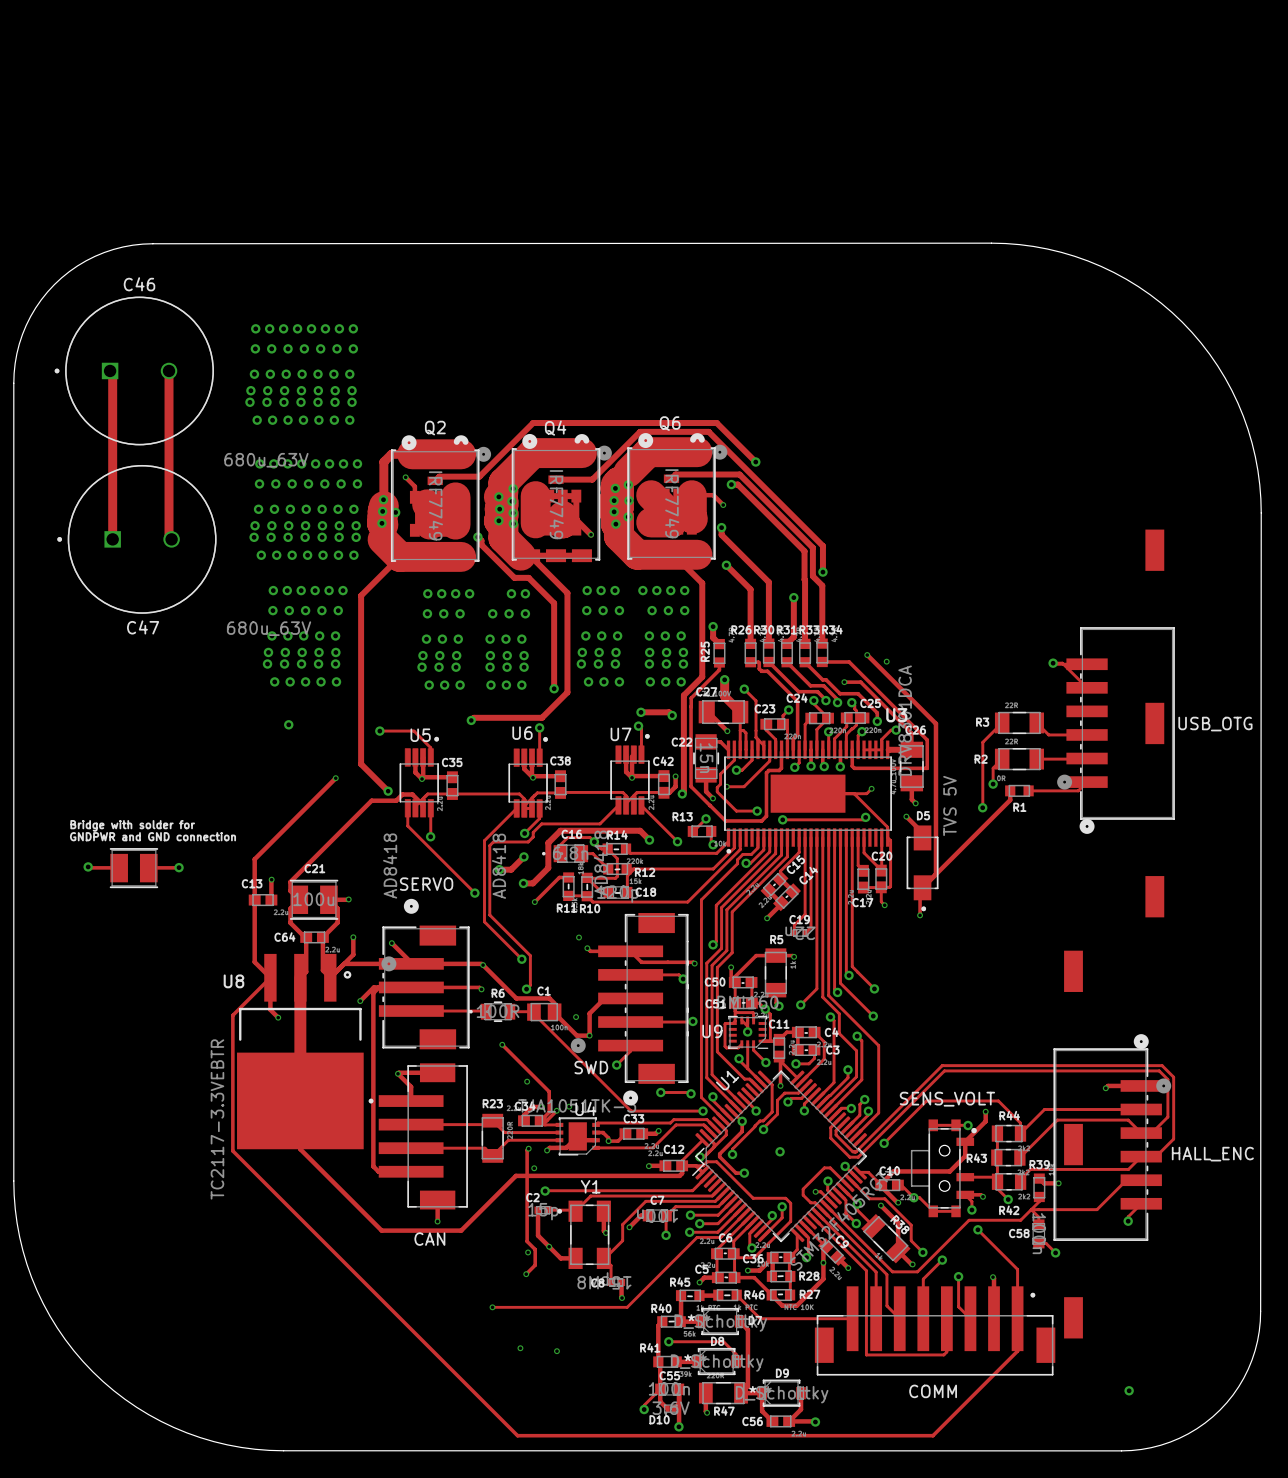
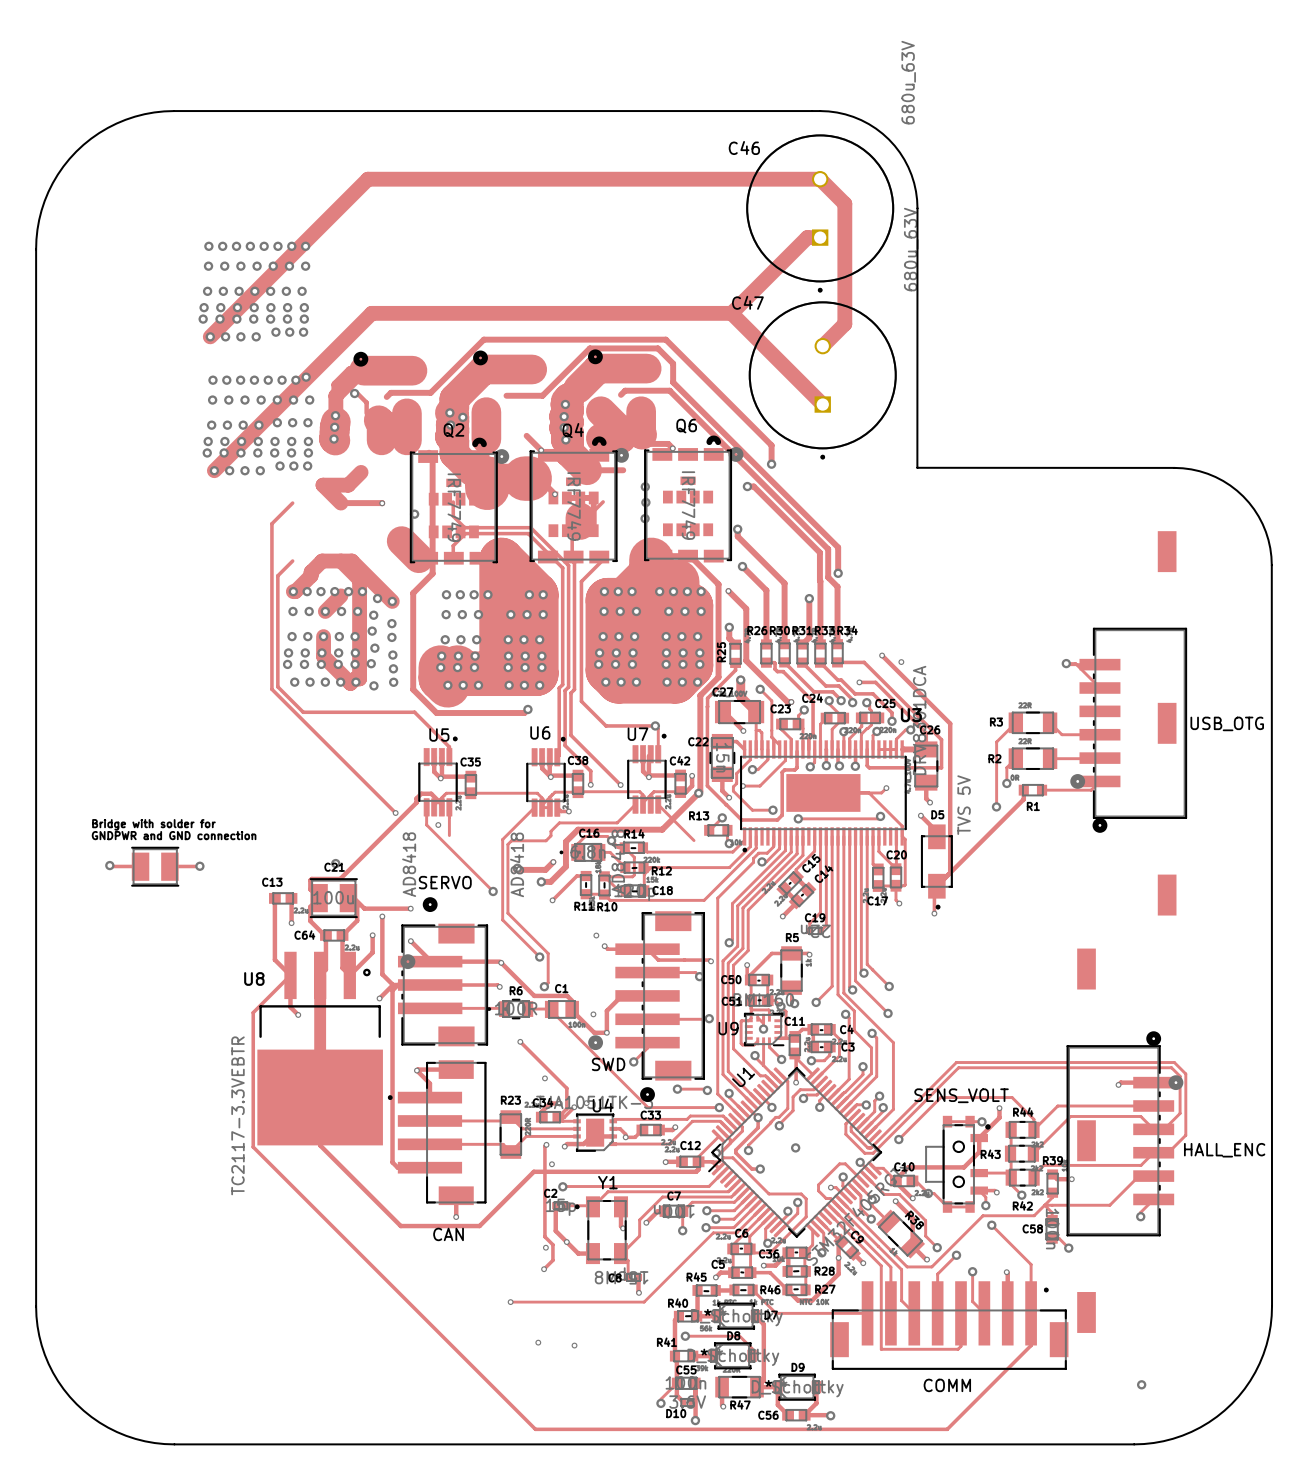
track: none -> (820, 237) (807, 237) (731, 313)
via: none -> (208, 246)
via: none -> (222, 246)
via: none -> (236, 246)
via: none -> (250, 246)
via: none -> (264, 246)
via: none -> (277, 246)
via: none -> (291, 246)
via: none -> (305, 246)
via: none -> (208, 266)
via: none -> (224, 266)
via: none -> (240, 266)
via: none -> (257, 266)
via: none -> (273, 266)
via: none -> (289, 266)
via: none -> (305, 266)
C46 name position: C46 (139, 284) -> C46 (744, 148)
via: none -> (207, 291)
via: none -> (223, 291)
via: none -> (239, 291)
via: none -> (254, 291)
via: none -> (270, 291)
via: none -> (286, 291)
via: none -> (302, 291)
via: none -> (204, 307)
via: none -> (220, 307)
via: none -> (237, 307)
via: none -> (254, 307)
via: none -> (270, 307)
via: none -> (287, 307)
via: none -> (304, 307)
track: none -> (731, 313) (822, 404)
track: none -> (731, 313) (371, 313) (214, 470)
via: none -> (203, 319)
via: none -> (220, 319)
via: none -> (236, 319)
via: none -> (253, 319)
via: none -> (270, 319)
via: none -> (287, 319)
via: none -> (304, 319)
via: (297, 328) -> none
via: (311, 328) -> none
via: (325, 328) -> none
via: (339, 328) -> none
via: (353, 328) -> none
track: none -> (210, 336) (367, 179) (820, 179) (844, 203) (844, 324) (822, 346)
via: none -> (210, 336)
via: none -> (225, 336)
via: none -> (240, 336)
via: none -> (256, 336)
via: (255, 348) -> none
via: (271, 348) -> none
via: (288, 348) -> none
via: (304, 348) -> none
via: (320, 348) -> none
via: (337, 348) -> none
via: (353, 348) -> none
part: none -> (595, 356)
part: none -> (480, 357)
part: none -> (360, 359)
track: (110, 370) (112, 373) (112, 539) -> none
C46 rotation: 0° (134, 370) -> 90° counterclockwise (820, 213)
C46 position: (134, 370) -> (820, 213)
track: (169, 370) (169, 536) (171, 539) -> none
via: (254, 374) -> none
via: (270, 374) -> none
via: (302, 374) -> none
via: (318, 374) -> none
via: (333, 374) -> none
via: (349, 374) -> none
via: none -> (212, 380)
via: none -> (226, 380)
via: none -> (240, 380)
via: none -> (254, 380)
via: none -> (268, 380)
via: none -> (282, 380)
via: none -> (295, 380)
board edge: (13, 383) (16, 353) (22, 334) (35, 307) (54, 284) (69, 271) (94, 256) (123, 246) (142, 244) (1005, 243) (1047, 249) (1074, 256) (1113, 272) (1150, 294) (1191, 332) (1225, 378) (1248, 429) (1259, 484) (1260, 1311) -> (36, 386) (36, 239) (44, 201) (63, 166) (83, 144) (107, 127) (135, 116) (173, 111) (820, 111) (845, 114) (875, 128) (888, 139) (904, 159) (911, 175) (917, 199) (917, 467) (1191, 469) (1215, 477) (1237, 490) (1254, 509) (1265, 531) (1271, 565) (1272, 1306)
via: (250, 390) -> none
via: (267, 390) -> none
via: (284, 390) -> none
via: (301, 390) -> none
via: (318, 390) -> none
via: (352, 390) -> none
via: none -> (212, 400)
via: none -> (228, 400)
via: none -> (244, 400)
via: none -> (261, 400)
via: none -> (277, 400)
via: none -> (293, 400)
via: none -> (309, 400)
track: none -> (565, 400) (568, 397) (565, 404) (568, 407) (568, 411) (564, 416) (568, 421) (564, 427) (568, 432) (568, 436) (565, 439) (568, 442) (568, 451) (587, 470) (623, 470)
via: none -> (565, 404)
via: (249, 402) -> none
via: (266, 402) -> none
via: (283, 402) -> none
via: (301, 402) -> none
via: (318, 402) -> none
via: (335, 402) -> none
via: (352, 402) -> none
track: none -> (641, 411) (642, 434)
via: none -> (449, 412)
via: none -> (335, 415)
via: none -> (462, 417)
via: none -> (564, 416)
track: none -> (335, 422) (335, 395) (361, 370) (349, 370) (335, 384) (335, 415) (335, 422)
track: none -> (335, 422) (335, 440)
via: (303, 420) -> none
via: (318, 420) -> none
via: (334, 420) -> none
via: (349, 420) -> none
via: none -> (211, 425)
via: none -> (227, 425)
via: none -> (243, 425)
via: none -> (258, 425)
via: none -> (450, 425)
via: none -> (334, 427)
via: none -> (564, 427)
track: (708, 431) (640, 431) (592, 479) (556, 479) -> (725, 434) (673, 382) (673, 363) (657, 348) (589, 348) (542, 395) (506, 395)
via: none -> (333, 439)
via: none -> (565, 439)
via: none -> (208, 441)
via: none -> (224, 441)
via: none -> (241, 441)
via: none -> (258, 441)
via: none -> (275, 441)
via: none -> (291, 441)
via: none -> (308, 441)
part: (645, 440) -> none
part: (529, 441) -> none
track: none -> (641, 443) (668, 443) (672, 448)
part: (409, 442) -> none
via: none -> (672, 448)
via: none -> (541, 450)
via: none -> (207, 452)
via: none -> (224, 452)
via: none -> (240, 452)
via: none -> (257, 452)
via: none -> (274, 452)
via: none -> (291, 452)
via: none -> (308, 452)
track: none -> (429, 452) (432, 456) (432, 573) (413, 593) (413, 689) (436, 713) (524, 713) (527, 709)
track: (697, 452) (648, 452) (628, 472) -> (646, 368) (598, 368) (578, 388)
track: (581, 453) (533, 453) (503, 482) (503, 492) -> (532, 369) (483, 369) (454, 398) (454, 408)
track: (409, 454) (391, 454) (383, 462) (383, 524) -> none
track: (412, 454) (461, 454) -> (364, 370) (412, 370)
track: (755, 462) (716, 423) (533, 423) (479, 476) (439, 476) (435, 480) -> (771, 464) (771, 445) (665, 339) (483, 339) (430, 392) (390, 392) (386, 396)
via: (301, 463) -> none
via: (315, 463) -> none
via: (329, 463) -> none
via: (343, 463) -> none
via: (357, 463) -> none
via: none -> (214, 470)
via: none -> (229, 470)
via: none -> (244, 470)
via: none -> (260, 470)
track: none -> (361, 472) (348, 485) (323, 485) (340, 503) (382, 503)
track: (739, 474) (675, 474) (671, 478) -> (755, 476) (669, 390) (625, 390) (621, 394)
track: none -> (486, 478) (487, 487)
track: none -> (525, 478) (539, 478) (555, 494)
track: (405, 477) (414, 486) (414, 497) -> (357, 393) (366, 402) (366, 413)
via position: (405, 477) -> (382, 503)
via: (259, 483) -> none
via: (275, 483) -> none
via: (292, 483) -> none
via: (308, 483) -> none
via: (324, 483) -> none
via: (341, 483) -> none
via: (357, 483) -> none
track: (615, 484) (618, 481) (615, 488) (618, 491) (618, 495) (614, 500) (618, 505) (614, 511) (618, 516) (618, 521) (615, 524) (618, 527) (618, 536) (637, 554) (697, 554) -> none
via: (513, 488) -> none
via: (615, 488) -> none
via: none -> (555, 494)
track: (651, 495) (672, 516) (672, 522) (651, 522) -> (600, 411) (621, 431) (621, 438) (600, 438)
track: (498, 496) (503, 501) (503, 505) (499, 509) (503, 512) (503, 516) (498, 520) (503, 525) (503, 538) (521, 555) -> (449, 412) (454, 417) (454, 421) (450, 425) (454, 428) (454, 432) (449, 436) (454, 441) (454, 453) (471, 471)
via: (498, 496) -> none
track: (535, 496) (535, 523) -> (486, 412) (486, 439)
track: (455, 497) (455, 524) -> (406, 413) (406, 440)
via: (383, 499) -> none
track: none -> (453, 502) (453, 516) (464, 527) (530, 527) (568, 565) (568, 687) (565, 690) (565, 745) (590, 771) (590, 784)
track: none -> (603, 501) (572, 532) (572, 560) (574, 563) (574, 689) (571, 693) (571, 735) (620, 785)
via: (614, 500) -> none
track: none -> (292, 503) (271, 523) (271, 689) (395, 813)
via: (511, 501) -> none
track: (427, 504) (430, 507) (430, 524) -> (378, 420) (381, 423) (381, 440)
track: (723, 505) (713, 495) (691, 495) (692, 518) -> none
via: (723, 505) -> none
via: (258, 509) -> none
via: (274, 509) -> none
via: (290, 509) -> none
via: (306, 509) -> none
via: (322, 509) -> none
via: (338, 509) -> none
via: (353, 509) -> none
via: (499, 509) -> none
via: (382, 511) -> none
via: (614, 511) -> none
via: (513, 513) -> none
via: (498, 520) -> none
track: (576, 520) (591, 534) -> (526, 435) (541, 450)
via: (381, 523) -> none
via: (513, 523) -> none
via: (615, 524) -> none
via: (255, 525) -> none
via: (271, 525) -> none
via: (288, 525) -> none
via: (305, 525) -> none
via: (322, 525) -> none
via: (339, 525) -> none
via: (356, 525) -> none
via: (591, 534) -> none
via: (254, 537) -> none
via: (271, 537) -> none
via: (288, 537) -> none
via: (305, 537) -> none
via: (322, 537) -> none
via: (339, 537) -> none
via: (356, 537) -> none
track: (477, 537) (481, 540) (481, 544) (514, 577) (528, 577) (554, 603) (554, 688) -> none
via: (477, 537) -> none
C47 rotation: 0° (136, 539) -> 90° counterclockwise (822, 380)
C47 position: (136, 539) -> (822, 380)
via: (261, 555) -> none
via: (276, 555) -> none
via: (292, 555) -> none
via: (307, 555) -> none
via: (323, 555) -> none
via: (338, 555) -> none
via: (353, 555) -> none
track: (581, 555) (530, 555) (567, 593) (567, 692) (542, 717) (473, 717) (471, 720) -> none
track: (461, 556) (399, 556) (361, 595) (361, 764) (388, 791) -> none
track: none -> (603, 559) (581, 581) (581, 701) (606, 725) (655, 725)
track: none -> (651, 559) (651, 574) (625, 600) (607, 600) (607, 670) (618, 681) (675, 681) (690, 665) (690, 605) (646, 649) (646, 617) (677, 587) (677, 581)
track: none -> (340, 561) (359, 579) (359, 678) (355, 678) (350, 683) (323, 656) (323, 636)
track: none -> (728, 591) (746, 608) (746, 660) (787, 702) (791, 702)
via: none -> (728, 591)
track: none -> (293, 591) (311, 575) (311, 572) (322, 561) (351, 561) (392, 601)
track: none -> (340, 595) (325, 611)
via: none -> (377, 598)
via: none -> (392, 601)
via: none -> (373, 615)
via: none -> (391, 623)
C47 name position: C47 (143, 627) -> C47 (747, 302)
via: none -> (372, 631)
via: none -> (391, 637)
via: none -> (374, 648)
via: none -> (392, 655)
via: none -> (371, 663)
track: none -> (440, 667) (440, 678) (447, 685)
track: none -> (457, 667) (463, 673) (536, 673) (536, 594) (501, 559) (501, 660) (508, 667)
via: none -> (393, 668)
via: none -> (393, 682)
via: none -> (373, 685)
via: (554, 688) -> none
via: none -> (791, 702)
via: none -> (527, 709)
track: (640, 712) (669, 712) (672, 715) -> none
via: (640, 712) -> none
via: (672, 715) -> none
via: (471, 720) -> none
via: (288, 724) -> none
track: (539, 727) (539, 757) -> (453, 559) (453, 545) (465, 533) (528, 533) (562, 568) (562, 684) (559, 688) (559, 755) (557, 757)
via: (539, 727) -> none
track: (379, 731) (413, 731) (430, 747) -> (292, 561) (277, 575) (277, 686) (303, 712) (414, 712) (449, 747)
via: (379, 731) -> none
track: (335, 778) (254, 859) (254, 900) -> none
via: (335, 778) -> none
via: none -> (590, 784)
via: none -> (620, 785)
via: (388, 791) -> none
track: (397, 799) (371, 800) (291, 880) -> (416, 798) (416, 802) (340, 878) (311, 878)
track: (539, 808) (539, 818) (524, 833) -> (557, 807) (561, 811) (568, 811)
via: none -> (568, 811)
via: none -> (395, 813)
via: none -> (438, 825)
track: (640, 830) (649, 840) -> (656, 829) (662, 829) (698, 793)
via: (524, 833) -> none
via: (430, 836) -> none
via: (649, 840) -> none
via: (677, 841) -> none
track: (523, 856) (511, 869) (499, 869) -> none
via: (523, 856) -> none
track: none -> (553, 862) (545, 869) (516, 869)
via: none -> (553, 862)
via: none -> (335, 863)
track: (271, 879) (271, 900) -> (291, 923) (291, 898)
via: (271, 879) -> none
track: (348, 899) (334, 899) -> (410, 908) (364, 908) (353, 898)
via: (348, 899) -> none
via: none -> (410, 908)
track: none -> (382, 916) (382, 974) (393, 985)
via: none -> (382, 916)
via: none -> (291, 923)
track: (344, 963) (411, 963) -> none
board edge: (13, 1181) (17, 1223) (26, 1264) (43, 1303) (65, 1339) (103, 1381) (136, 1407) (173, 1427) (213, 1441) (241, 1447) (283, 1450) (1121, 1450) -> (36, 1176) (36, 1316) (44, 1354) (63, 1389) (83, 1410) (117, 1432) (145, 1441) (174, 1444) (1134, 1444)

